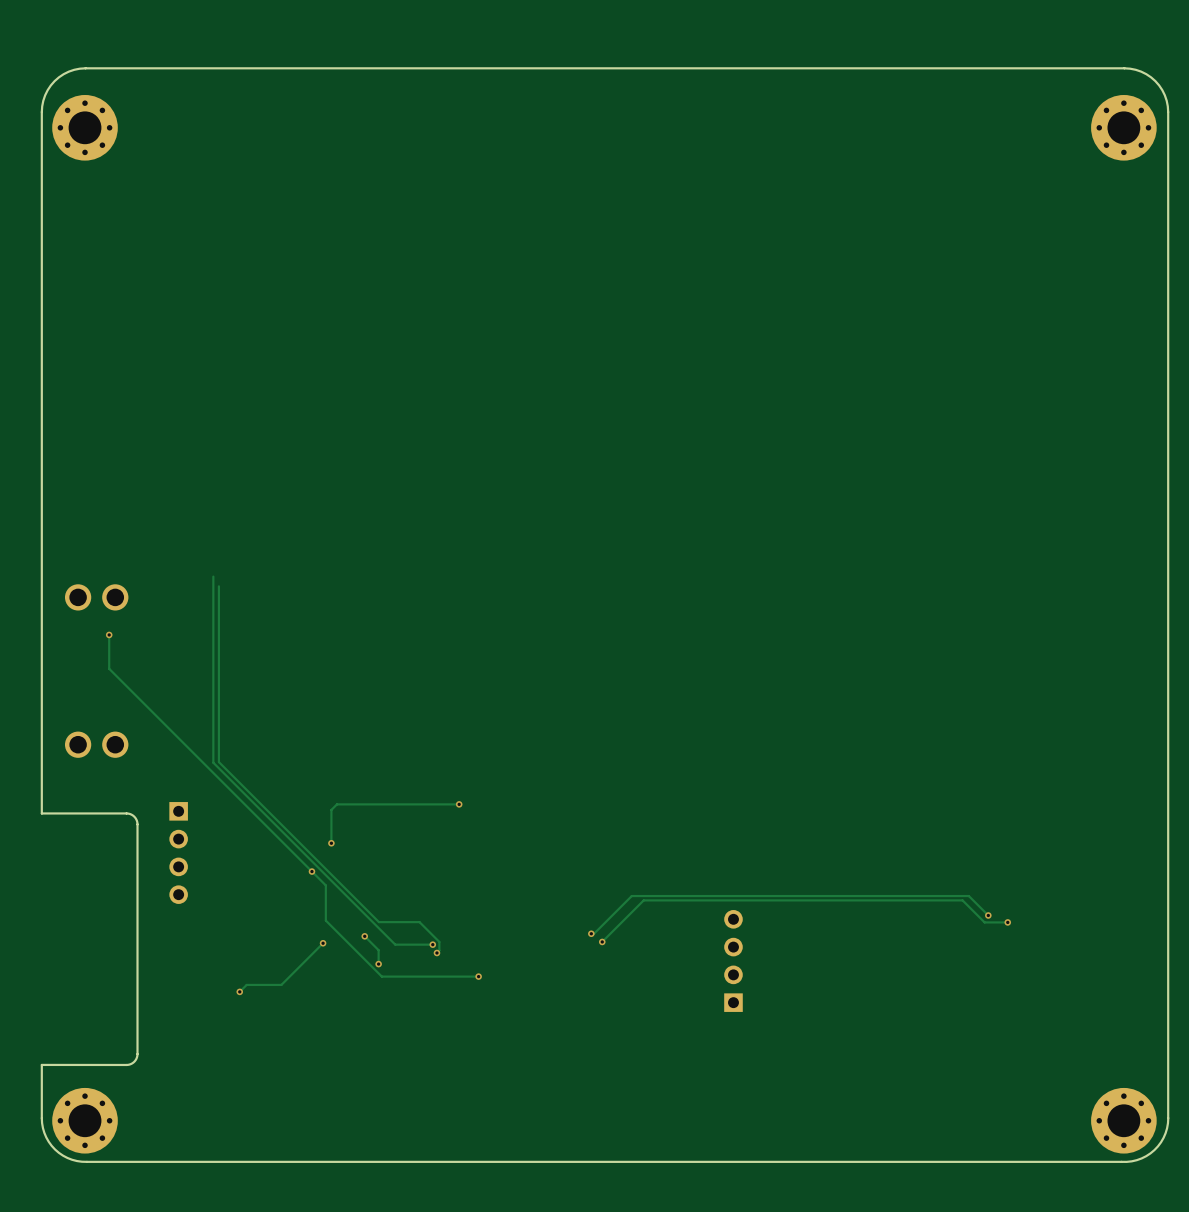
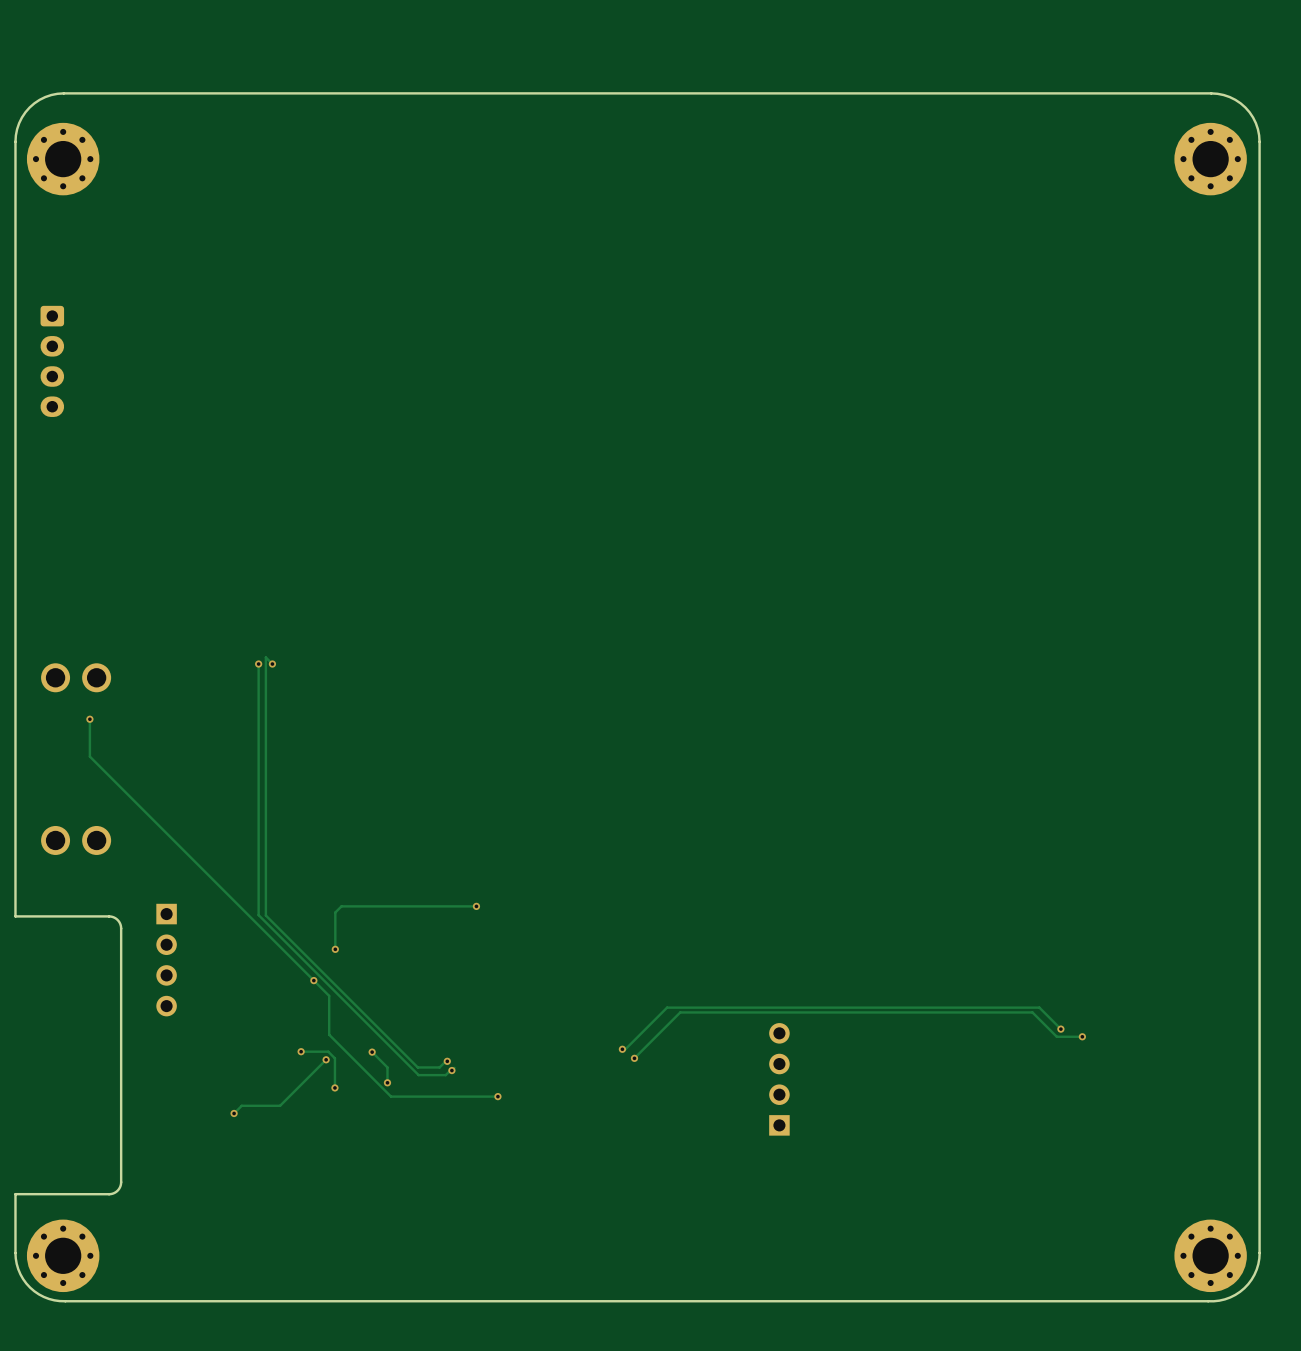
part: none -> (52, 361)
track: (213, 576) (213, 762) (395, 944) (431, 944) -> (272, 664) (265, 657) (265, 915) (417, 1067) (439, 1067) (445, 1061)
track: none -> (258, 664) (258, 915) (418, 1075) (445, 1075) (451, 1070)
via: none -> (258, 664)
via: none -> (272, 664)
track: (218, 586) (218, 762) (378, 922) (419, 922) (439, 941) (439, 950) -> none
track: none -> (301, 1051) (328, 1051) (334, 1058) (334, 1087)
via: none -> (301, 1051)
via: none -> (334, 1087)

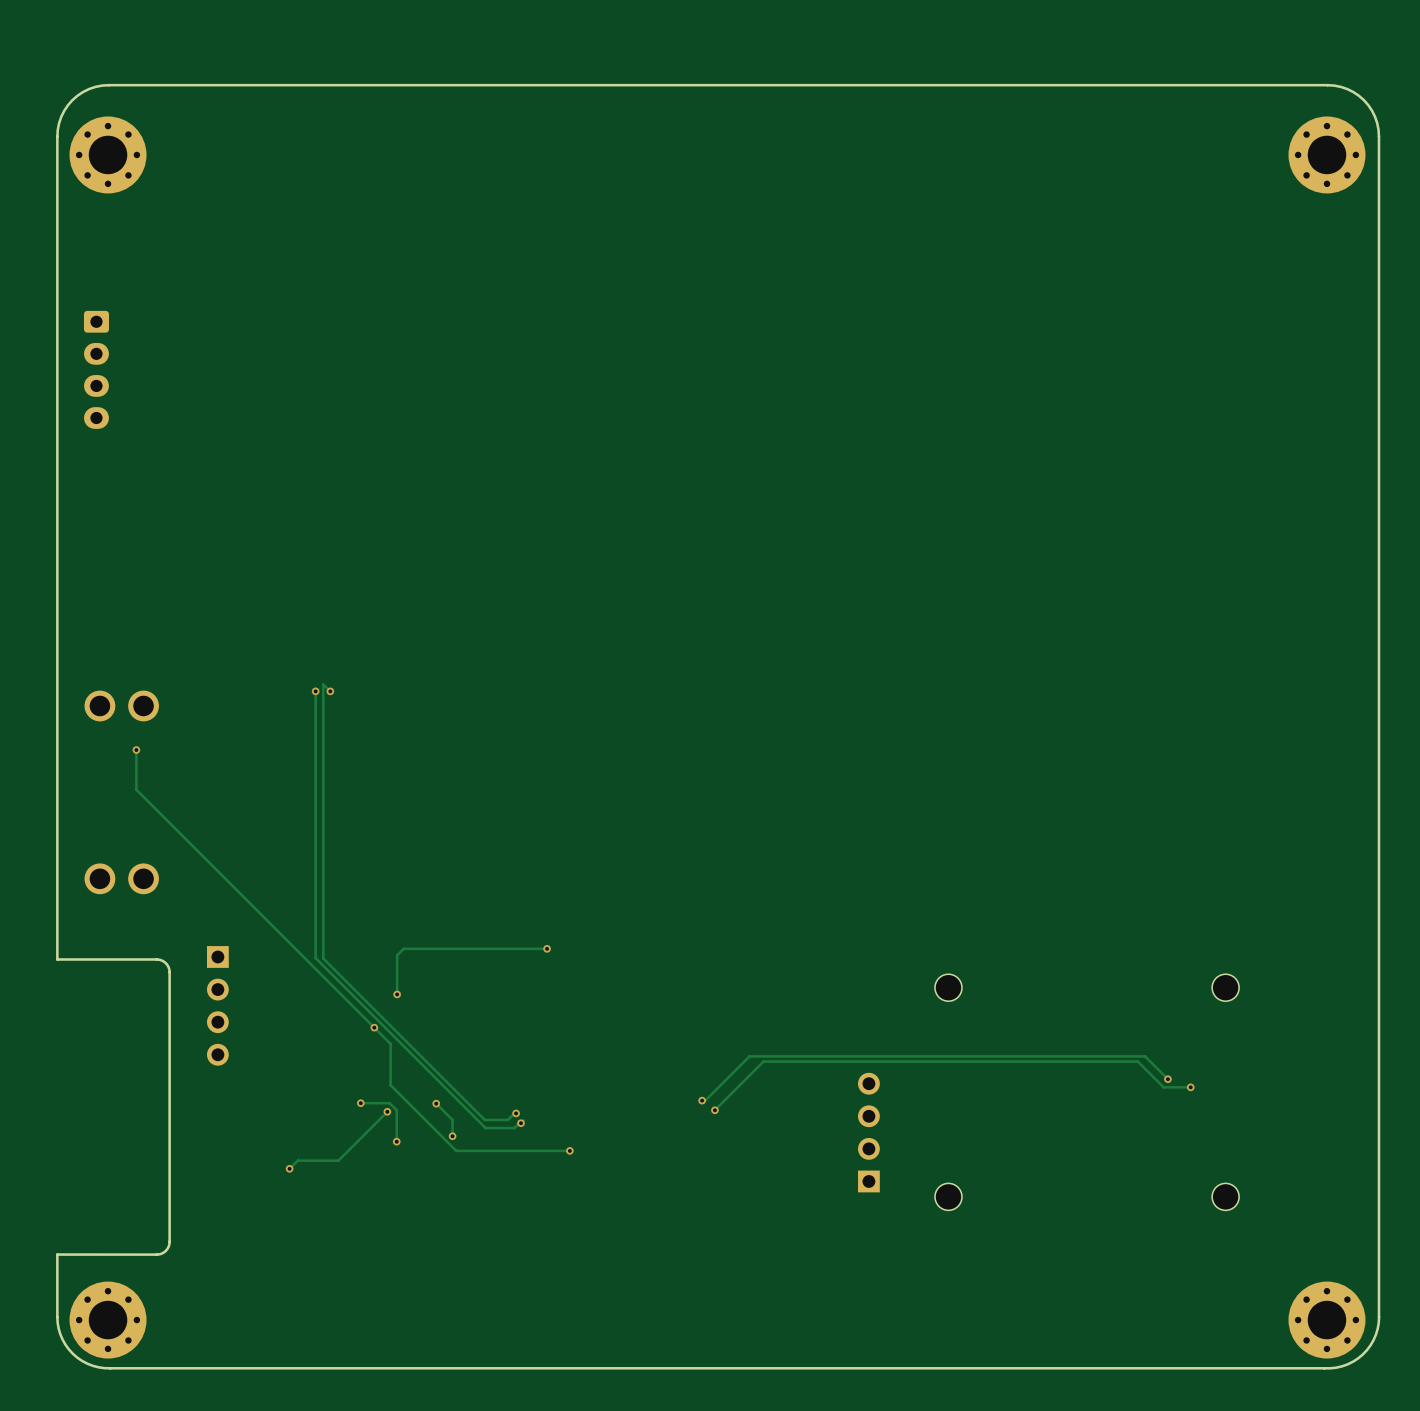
part: none -> (948, 987)
part: none -> (1225, 987)
part: none -> (948, 1196)
part: none -> (1225, 1196)

